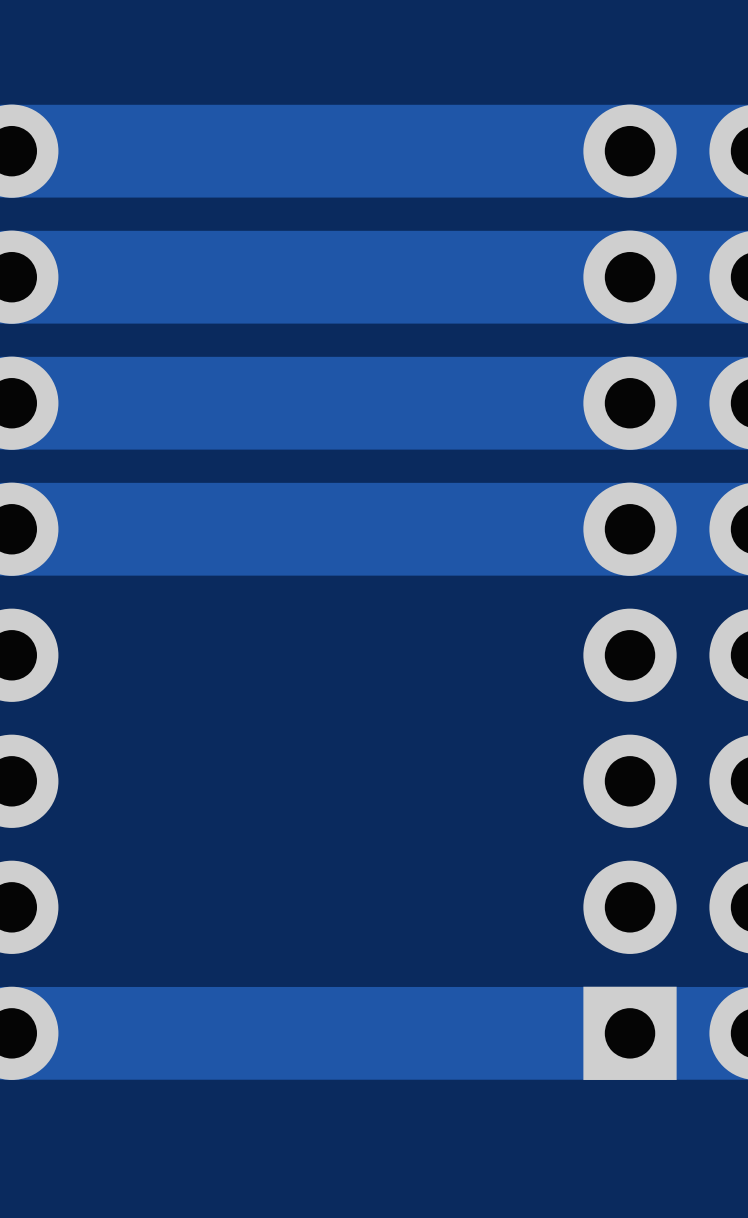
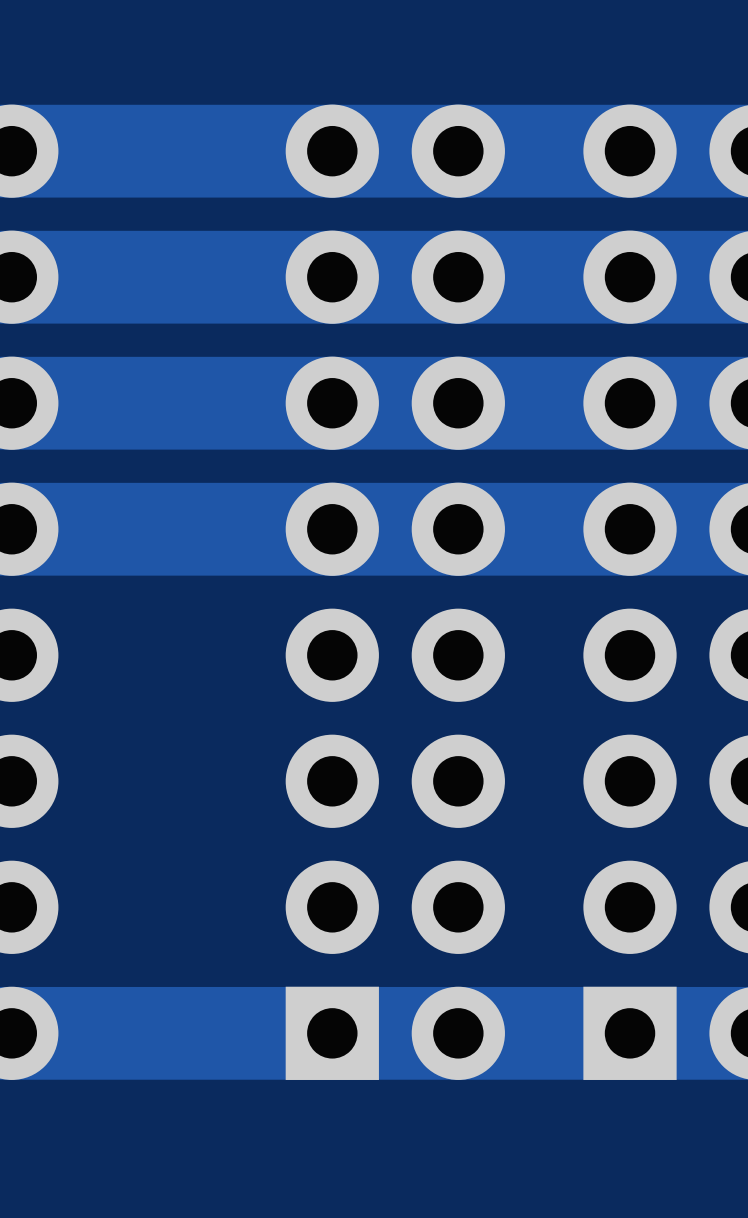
part: none -> (395, 592)

